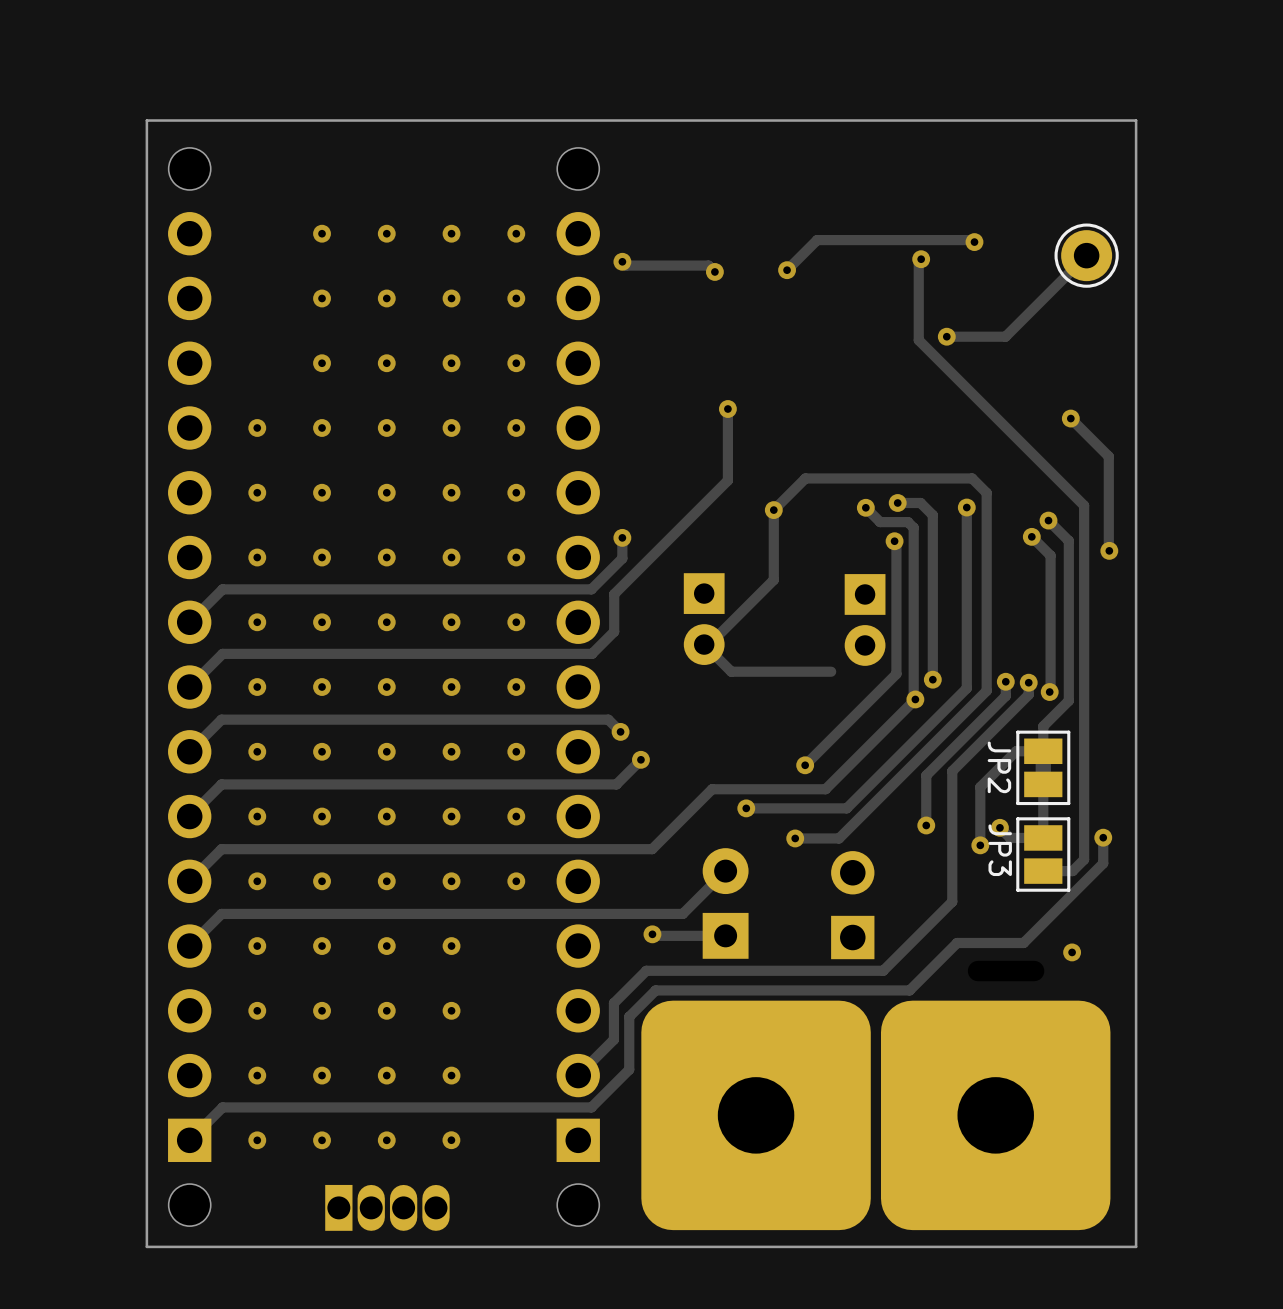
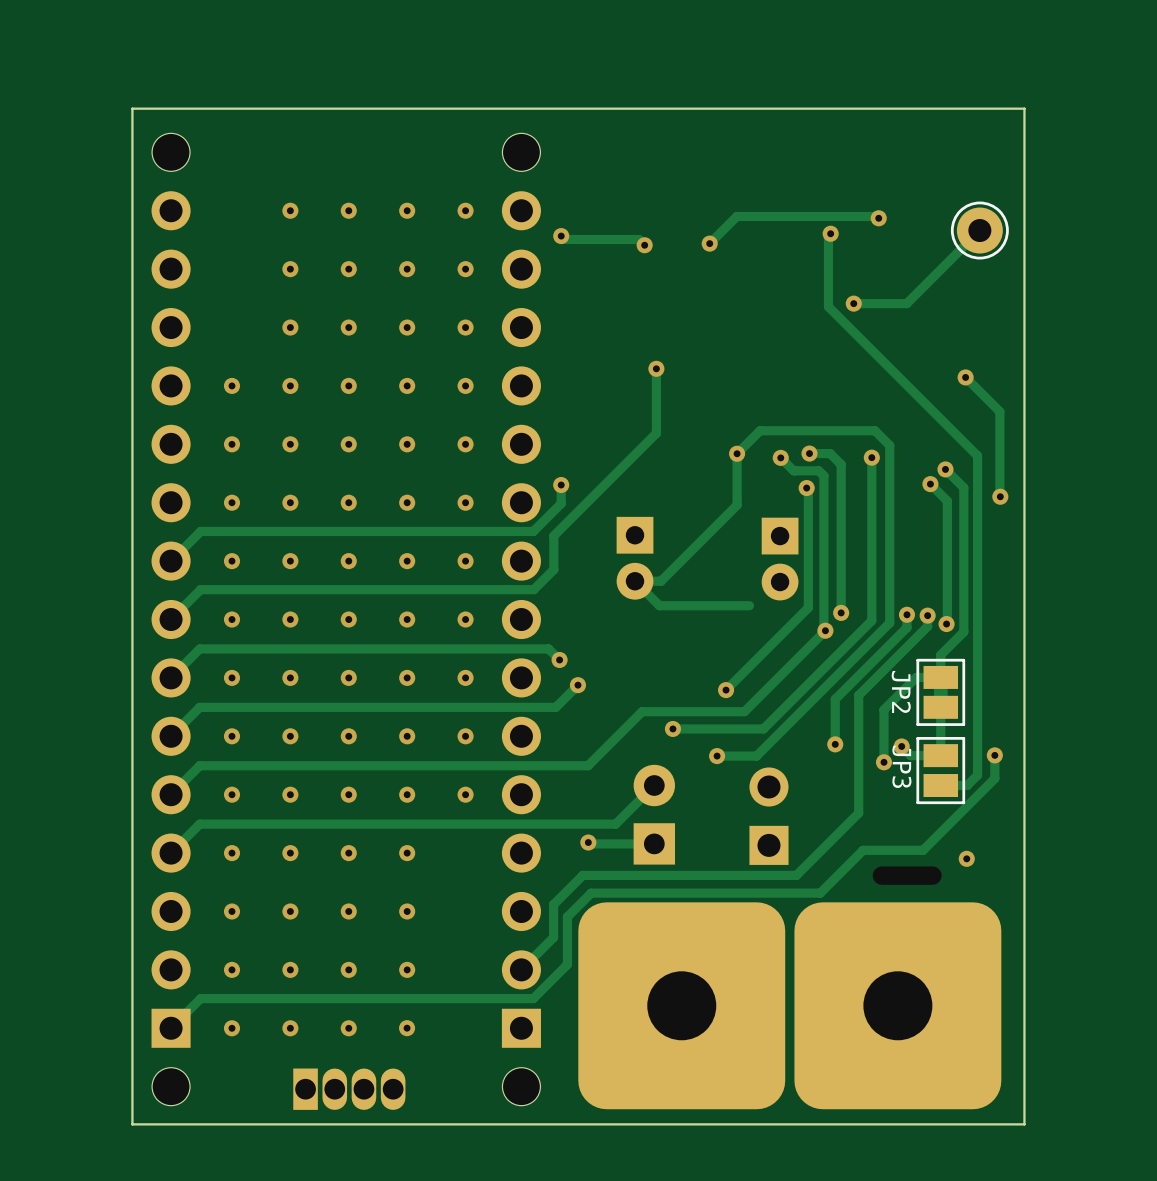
track: (986, 494) (972, 478) (805, 478) (773, 510) (773, 579) (709, 644) -> (889, 445) (875, 430) (760, 430) (737, 453) (737, 505) (661, 581) (639, 581)
via position: (773, 510) -> (737, 453)

